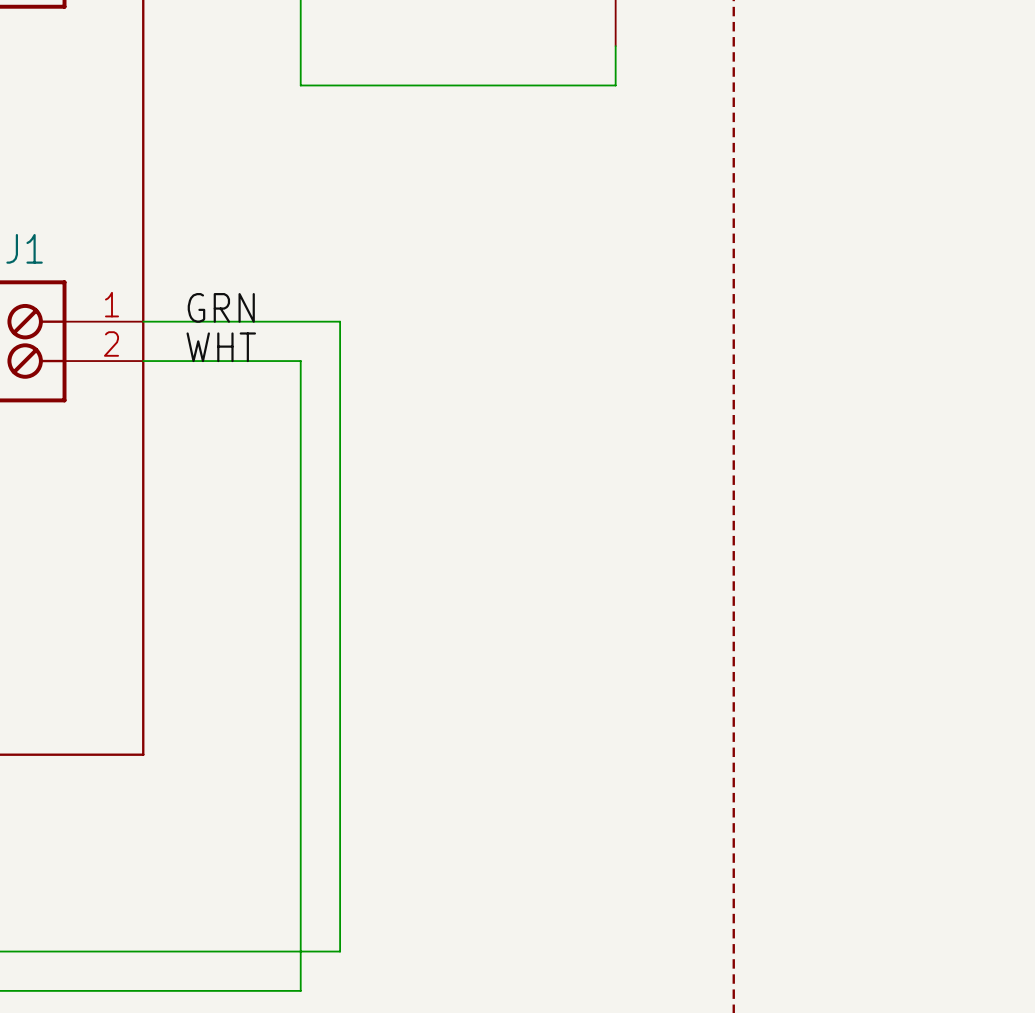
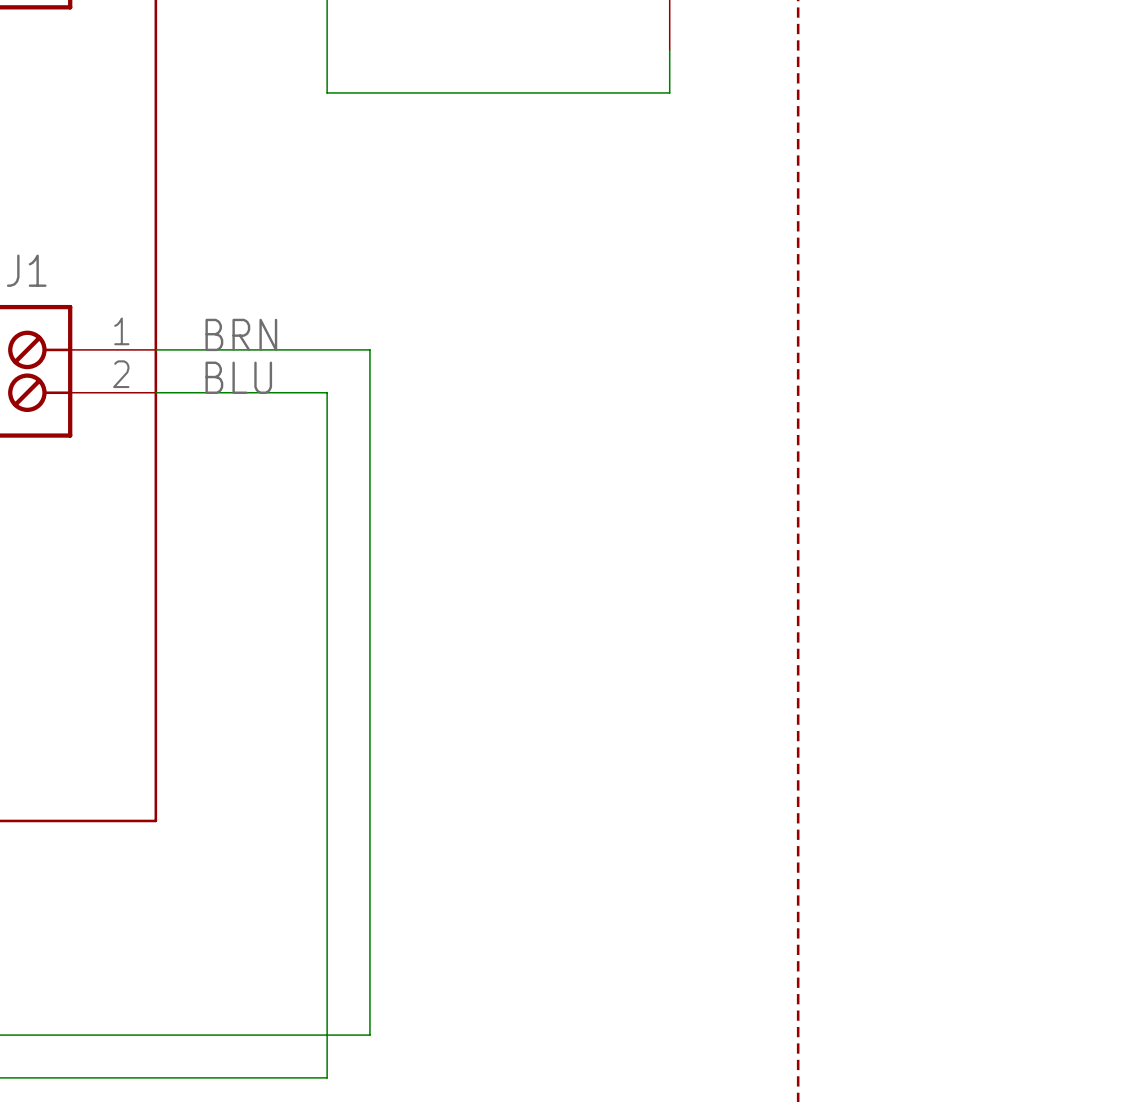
label: GRN (221, 307) -> BRN (241, 334)
label: WHT (221, 347) -> BLU (238, 377)

